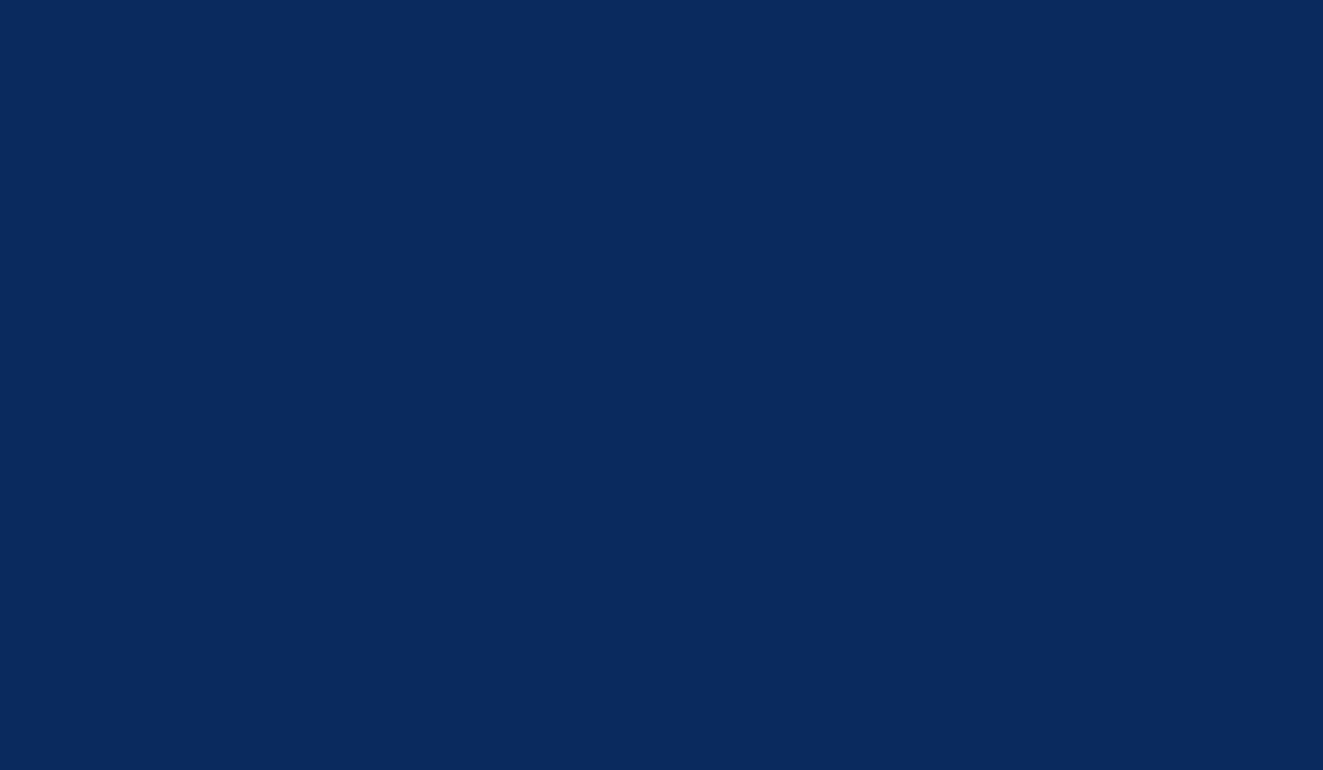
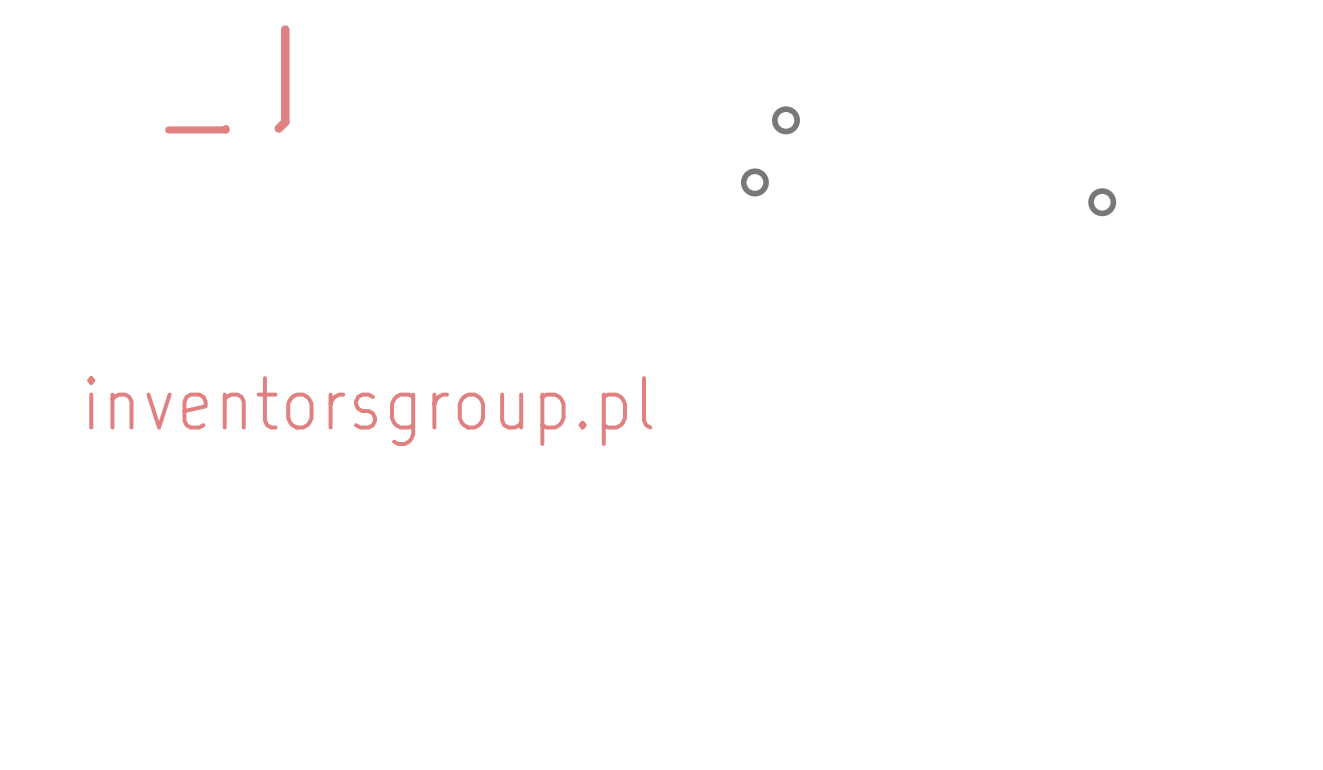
track: none -> (285, 29) (285, 122) (278, 128)
via: none -> (785, 120)
track: none -> (225, 128) (168, 129)
via: none -> (754, 182)
via: none -> (1102, 202)
text: none -> inventorsgroup.pl (369, 411)

